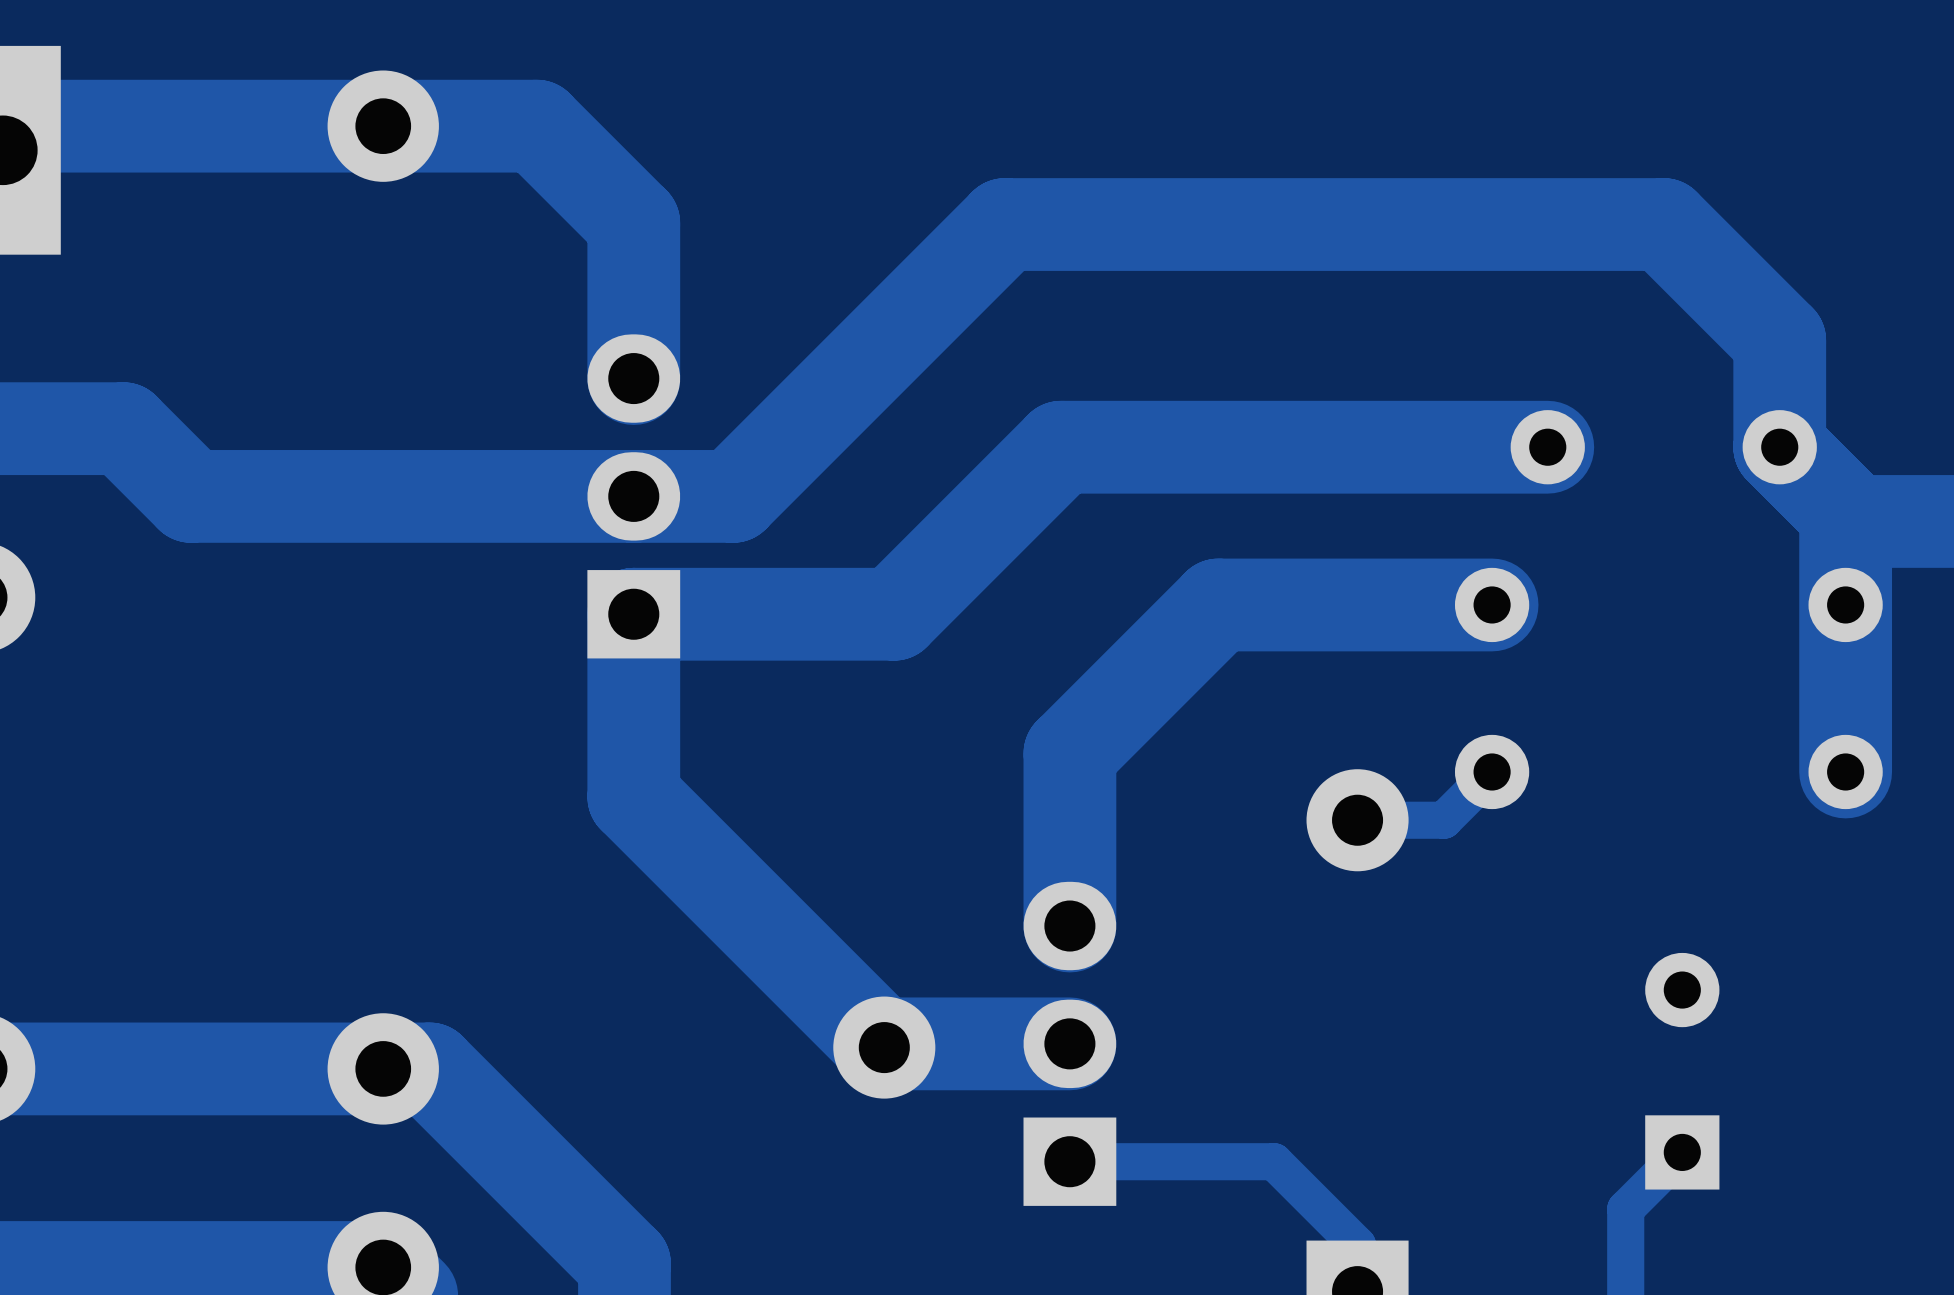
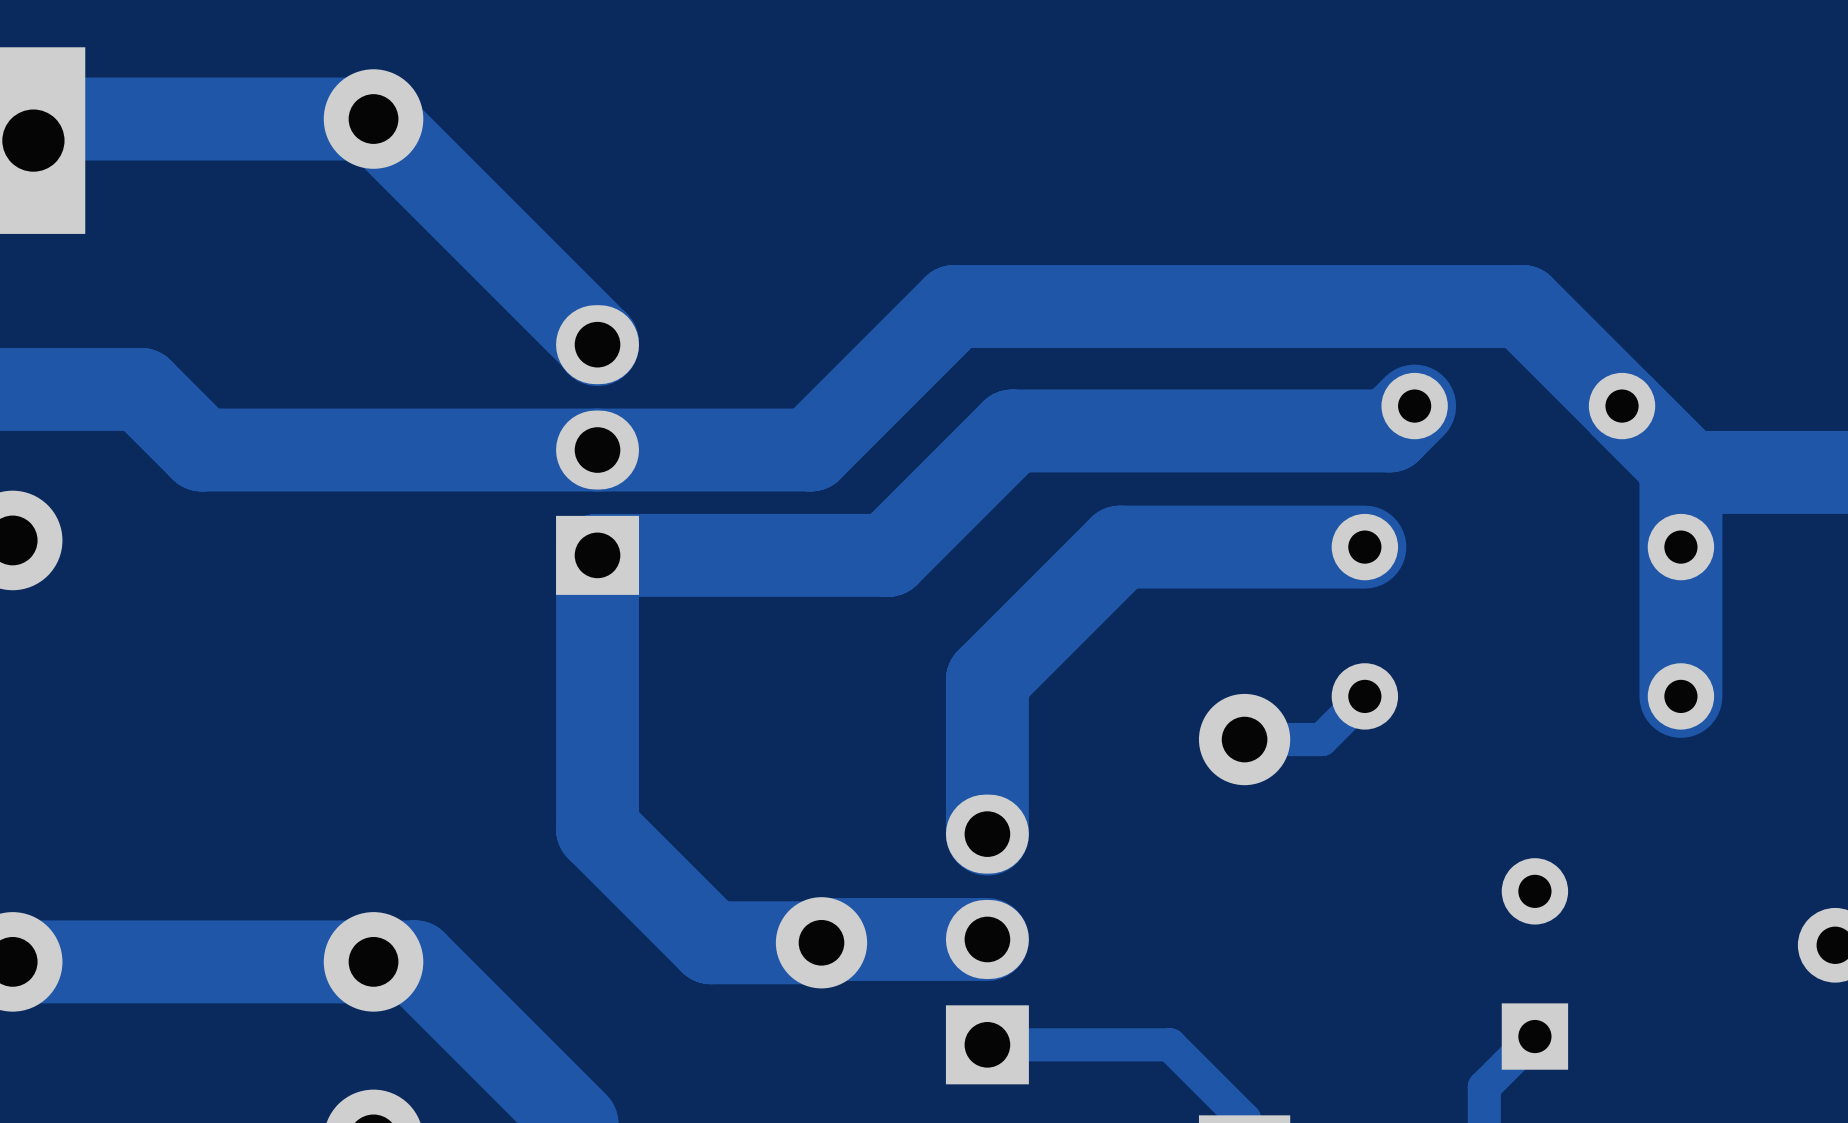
track: (383, 126) (536, 126) (633, 223) (633, 376) -> (373, 119) (597, 343)
track: (1547, 447) (1061, 447) (894, 614) -> (1414, 406) (1389, 430) (1012, 430) (887, 555) (830, 555)
track: (1779, 447) (1779, 340) (1663, 224) (1004, 224) (733, 496) -> (1622, 406) (1522, 306) (954, 306) (810, 450) (686, 450)
track: (633, 797) (884, 1047) -> (597, 718) (597, 829) (711, 942) (821, 942)

